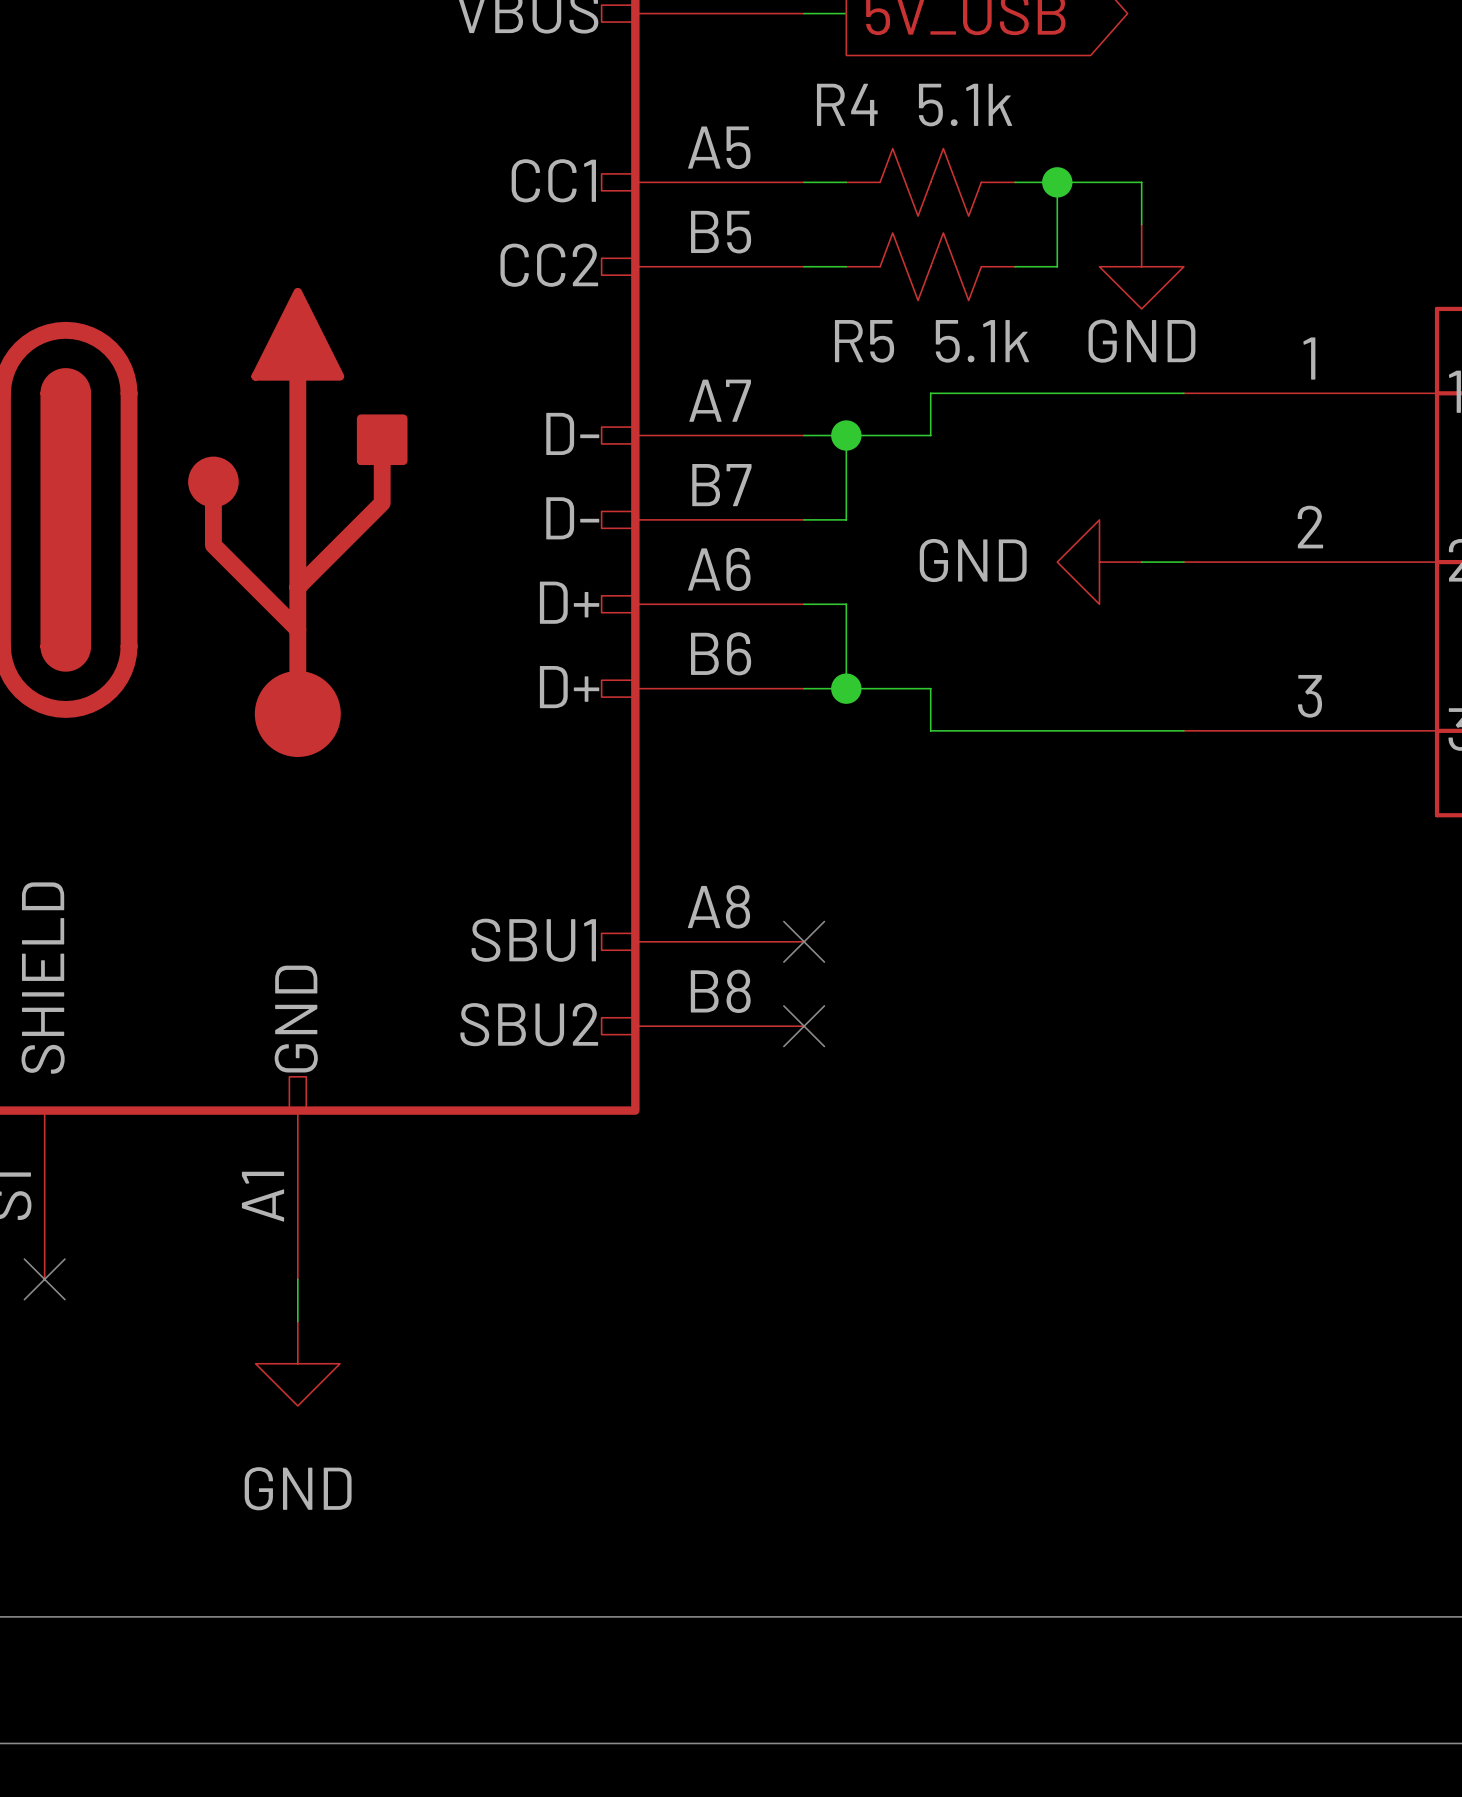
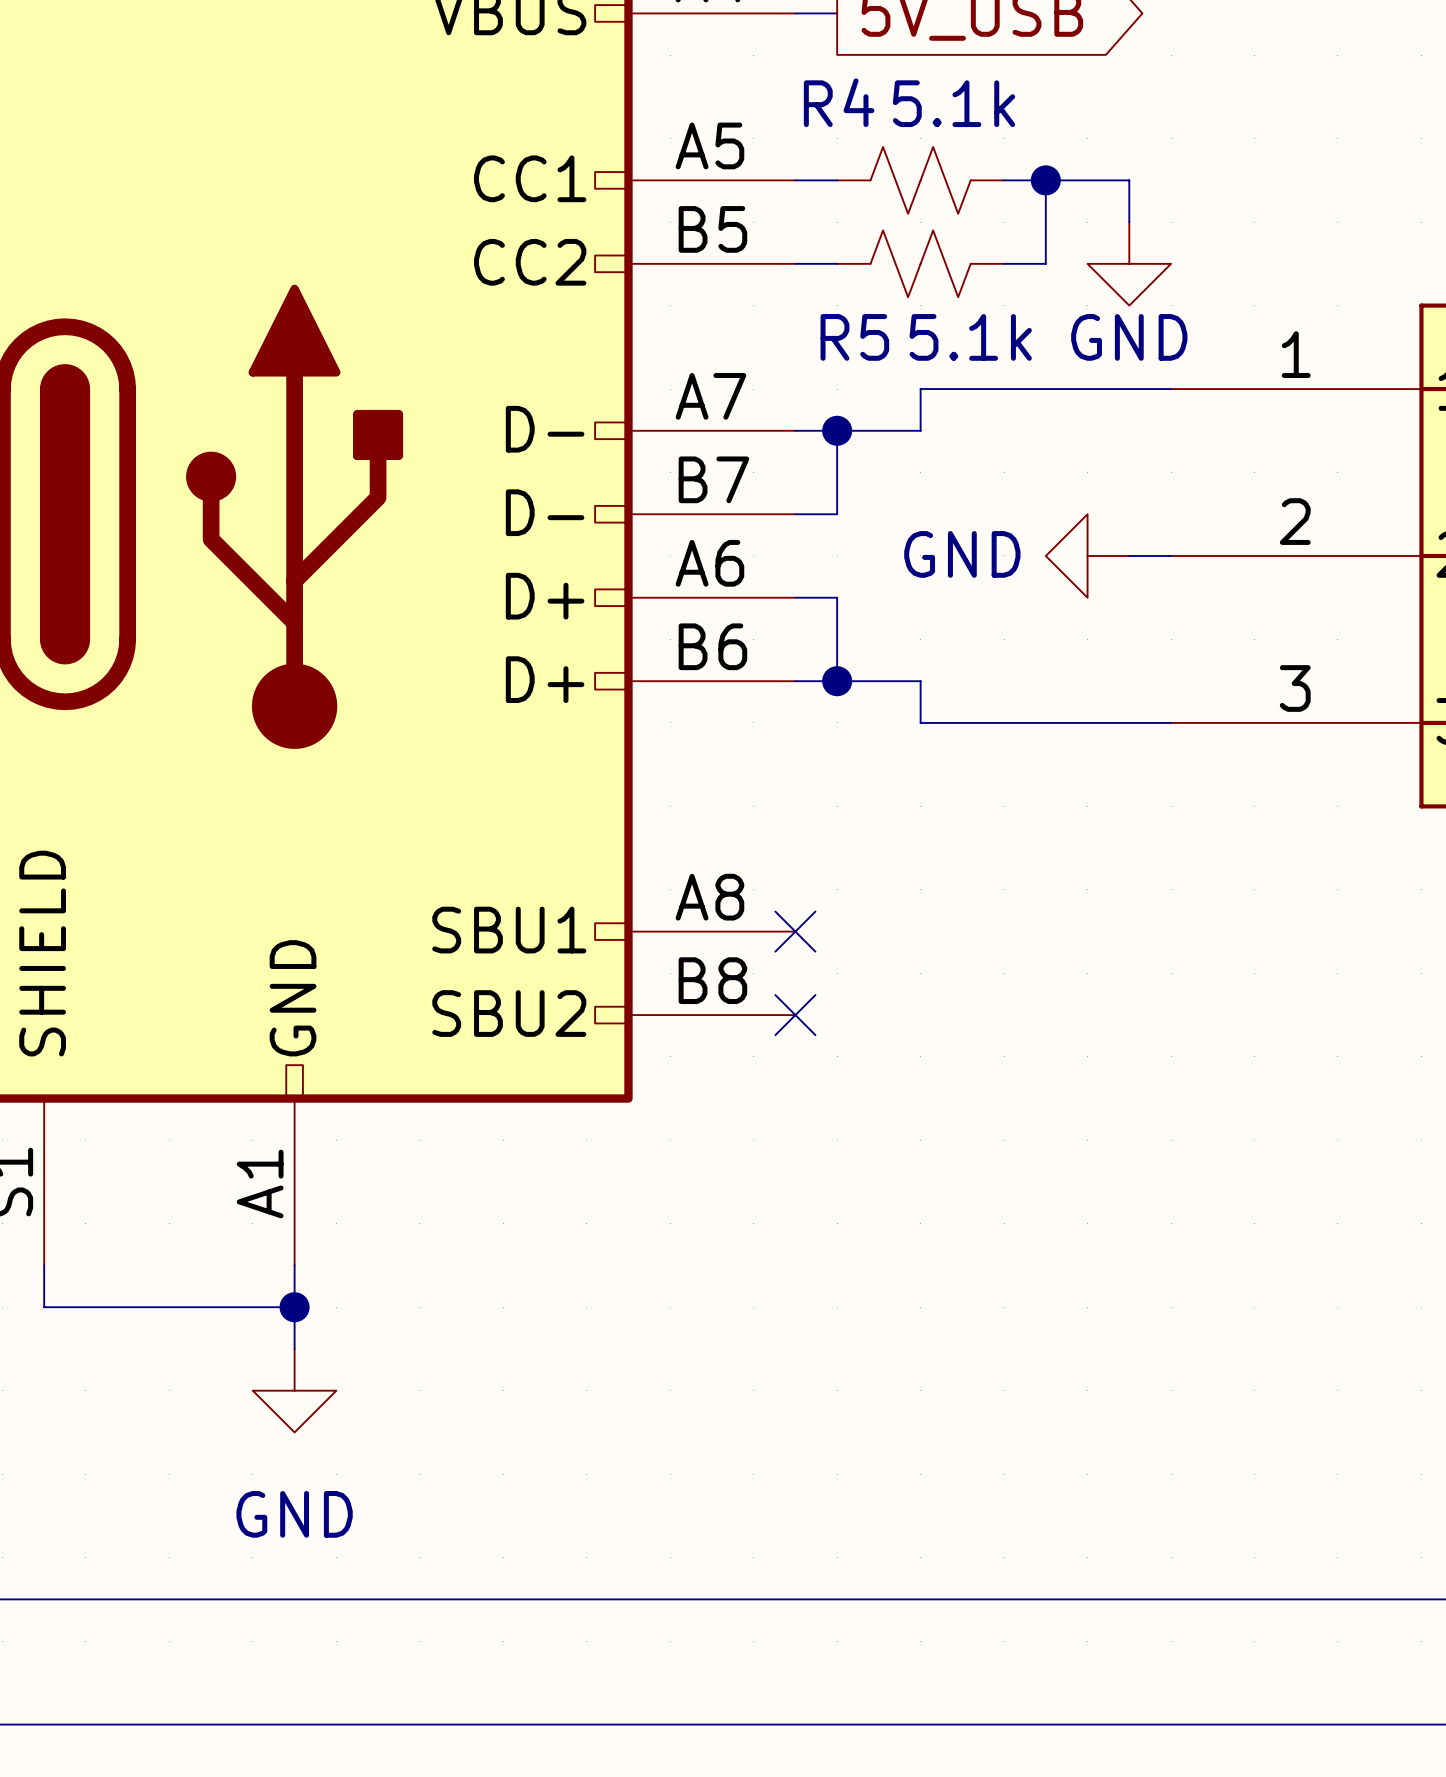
wire: none -> (44, 1265) (44, 1307) (294, 1307) (294, 1348)
no-connect mark: (44, 1279) -> none
junction: none -> (294, 1307)
power symbol position: GND (297, 1363) -> GND (294, 1390)

